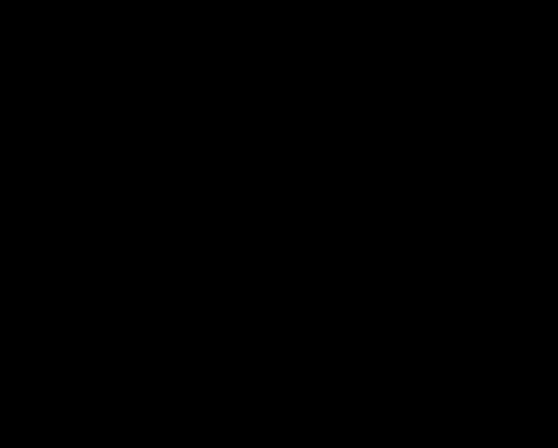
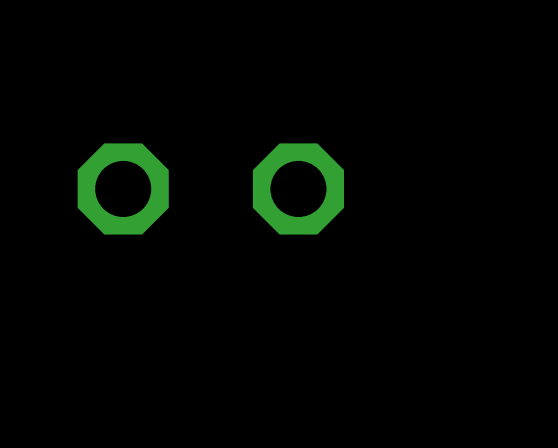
part: none -> (210, 188)

